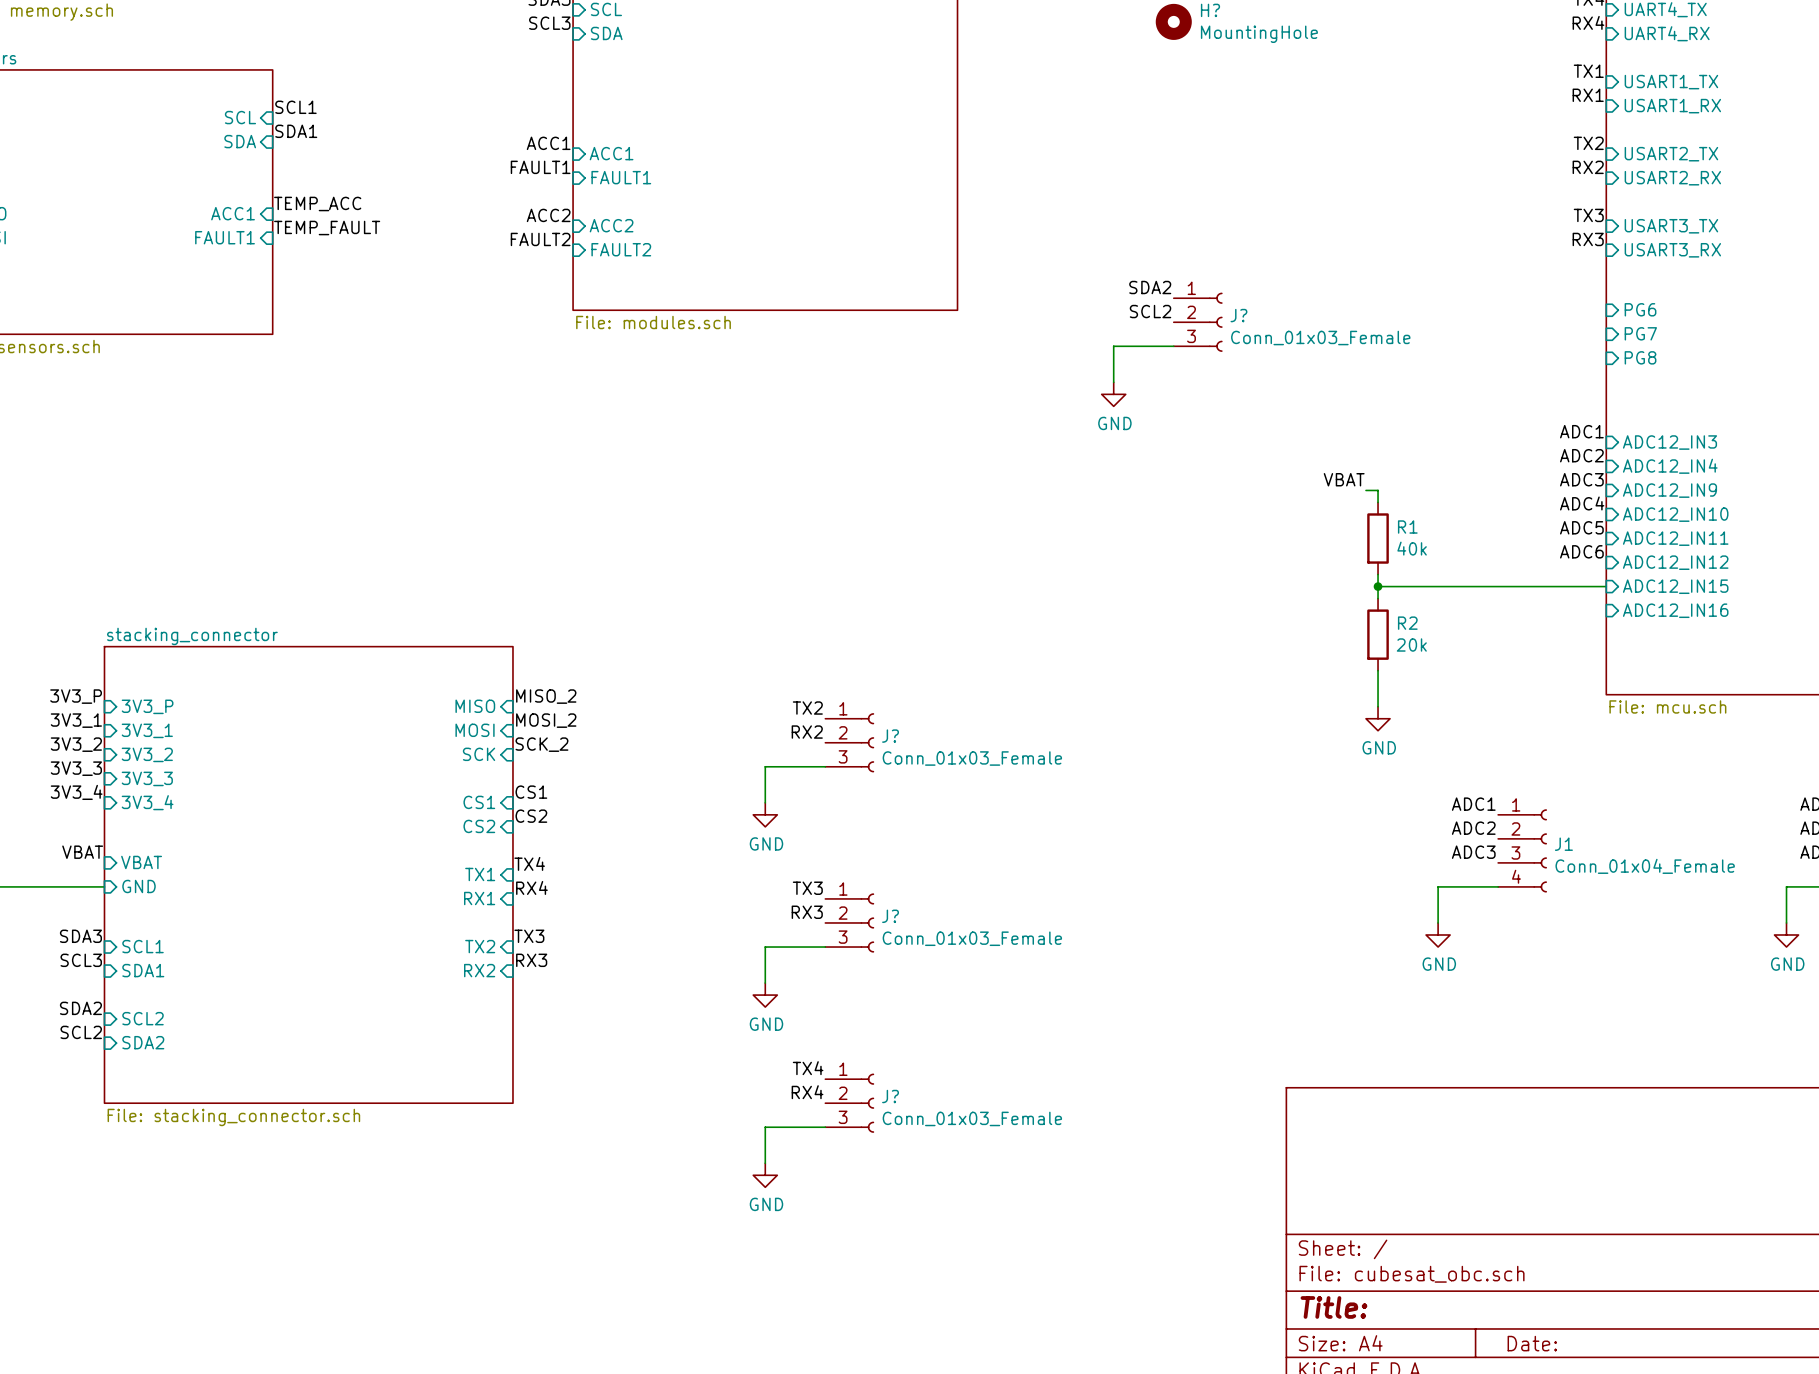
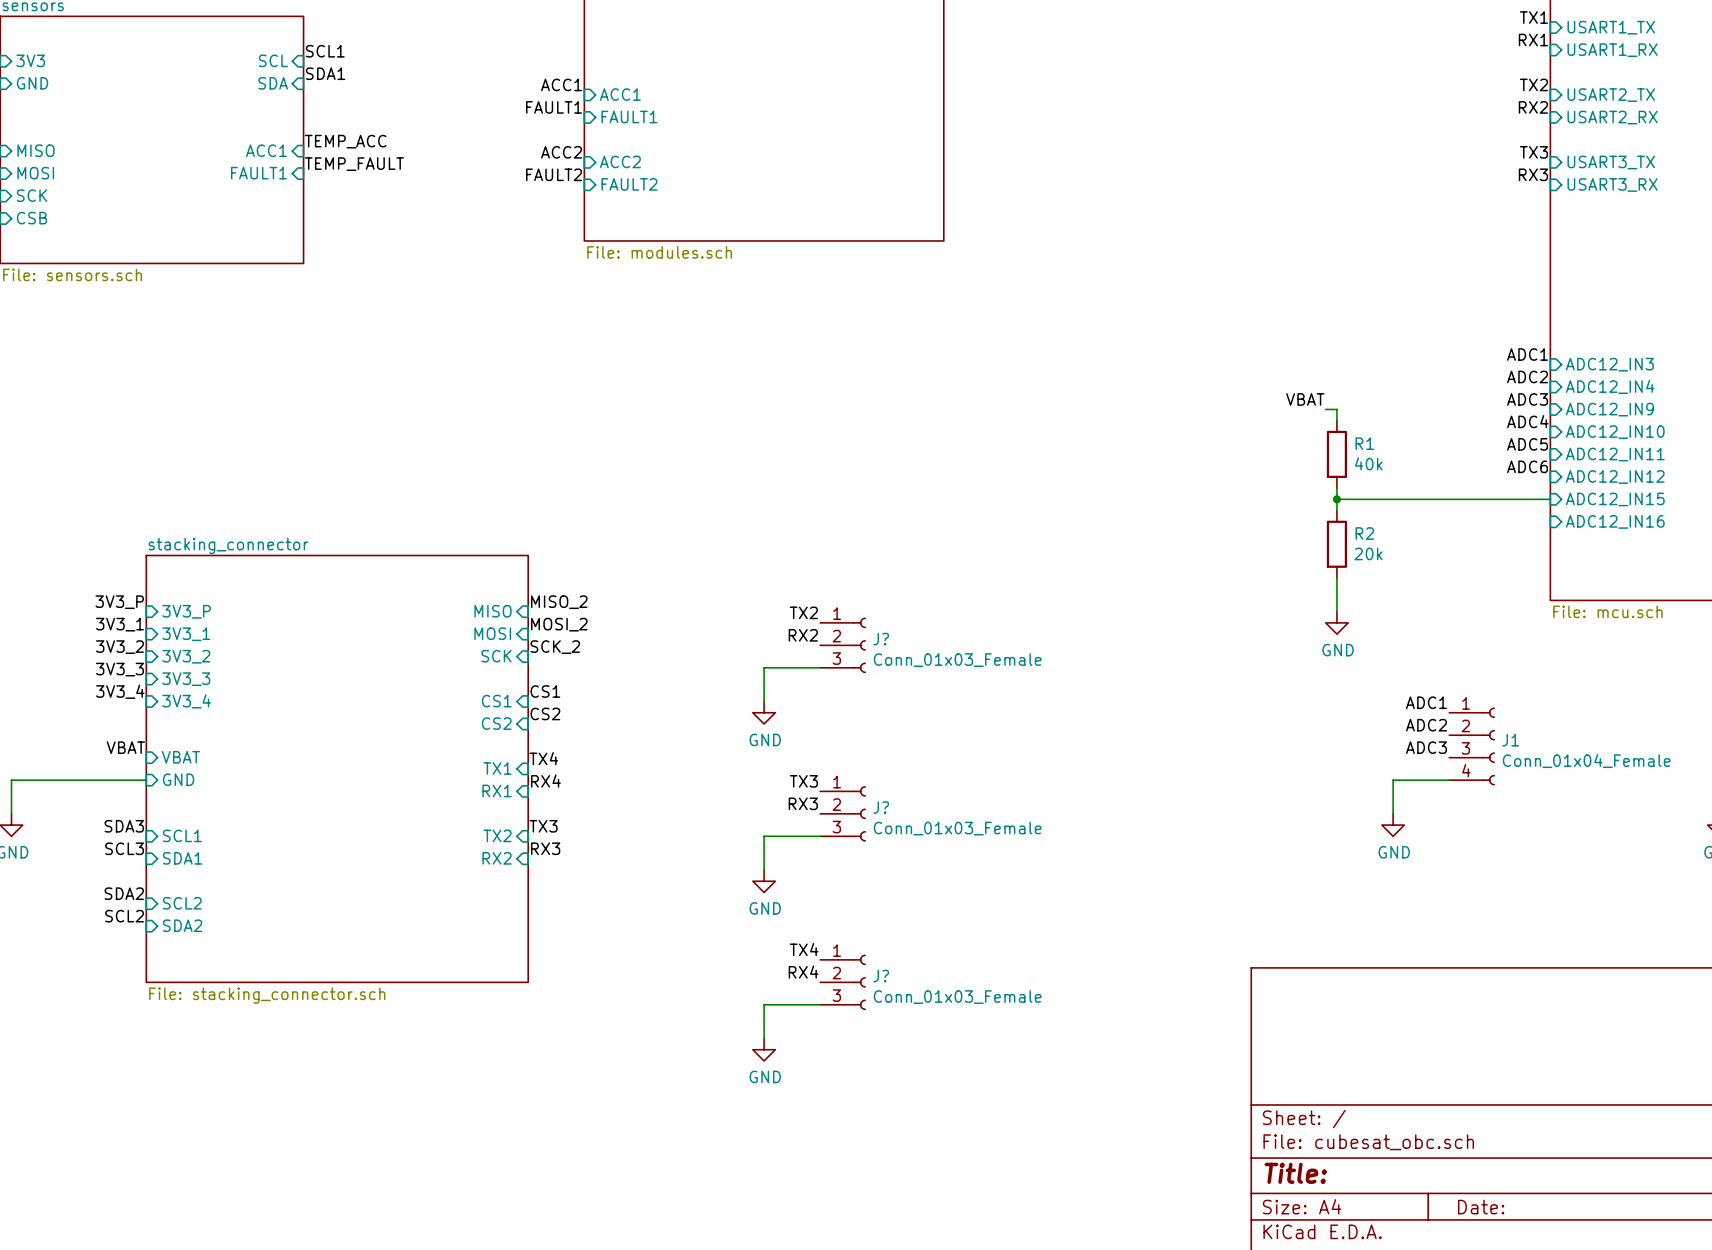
label: SDA2 (1150, 287) -> none
sheet pin: PG6 (1640, 309) -> none
label: SCL2 (1150, 311) -> none
J?: Conn_01x03_Female (1198, 322) -> none
sheet pin: PG7 (1640, 333) -> none
wire: (1173, 346) (1113, 346) (1113, 382) -> none
sheet pin: PG8 (1640, 357) -> none
power symbol: GND (1113, 394) -> none

